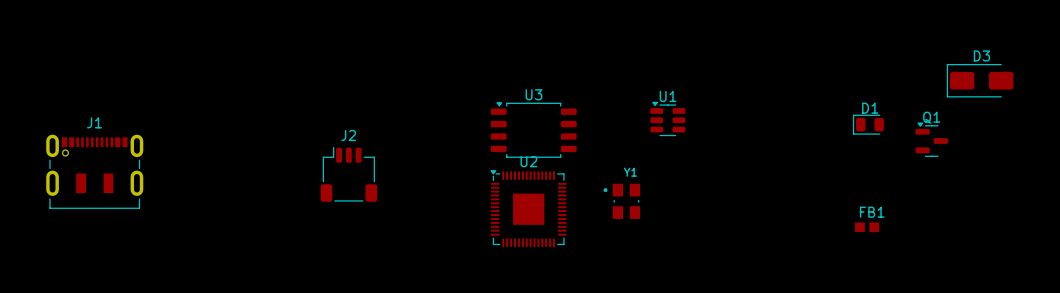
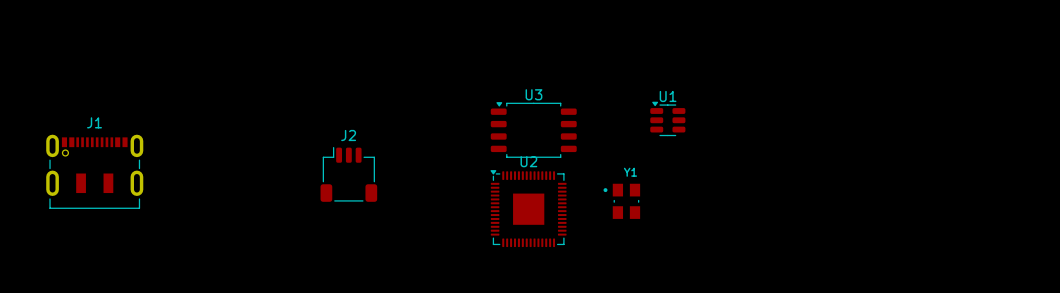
D3: (980, 80) -> none
D1: (868, 124) -> none
Q1: (931, 139) -> none
FB1: (867, 227) -> none

